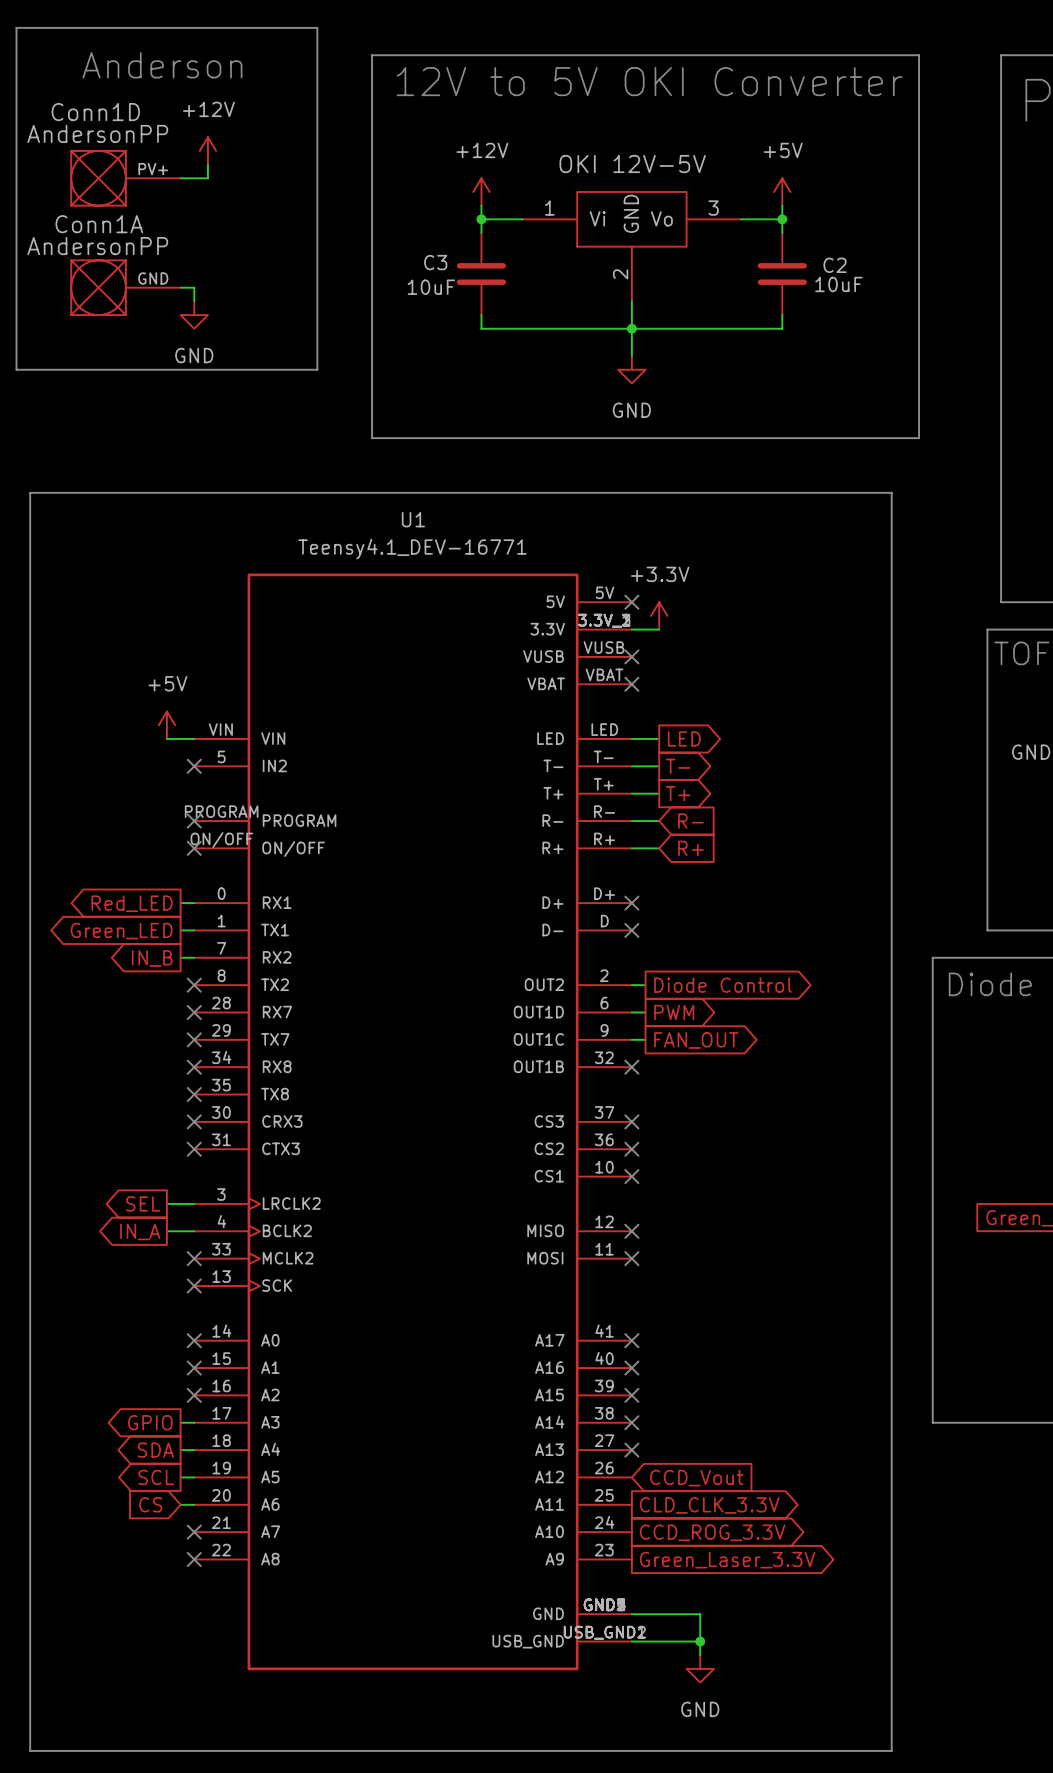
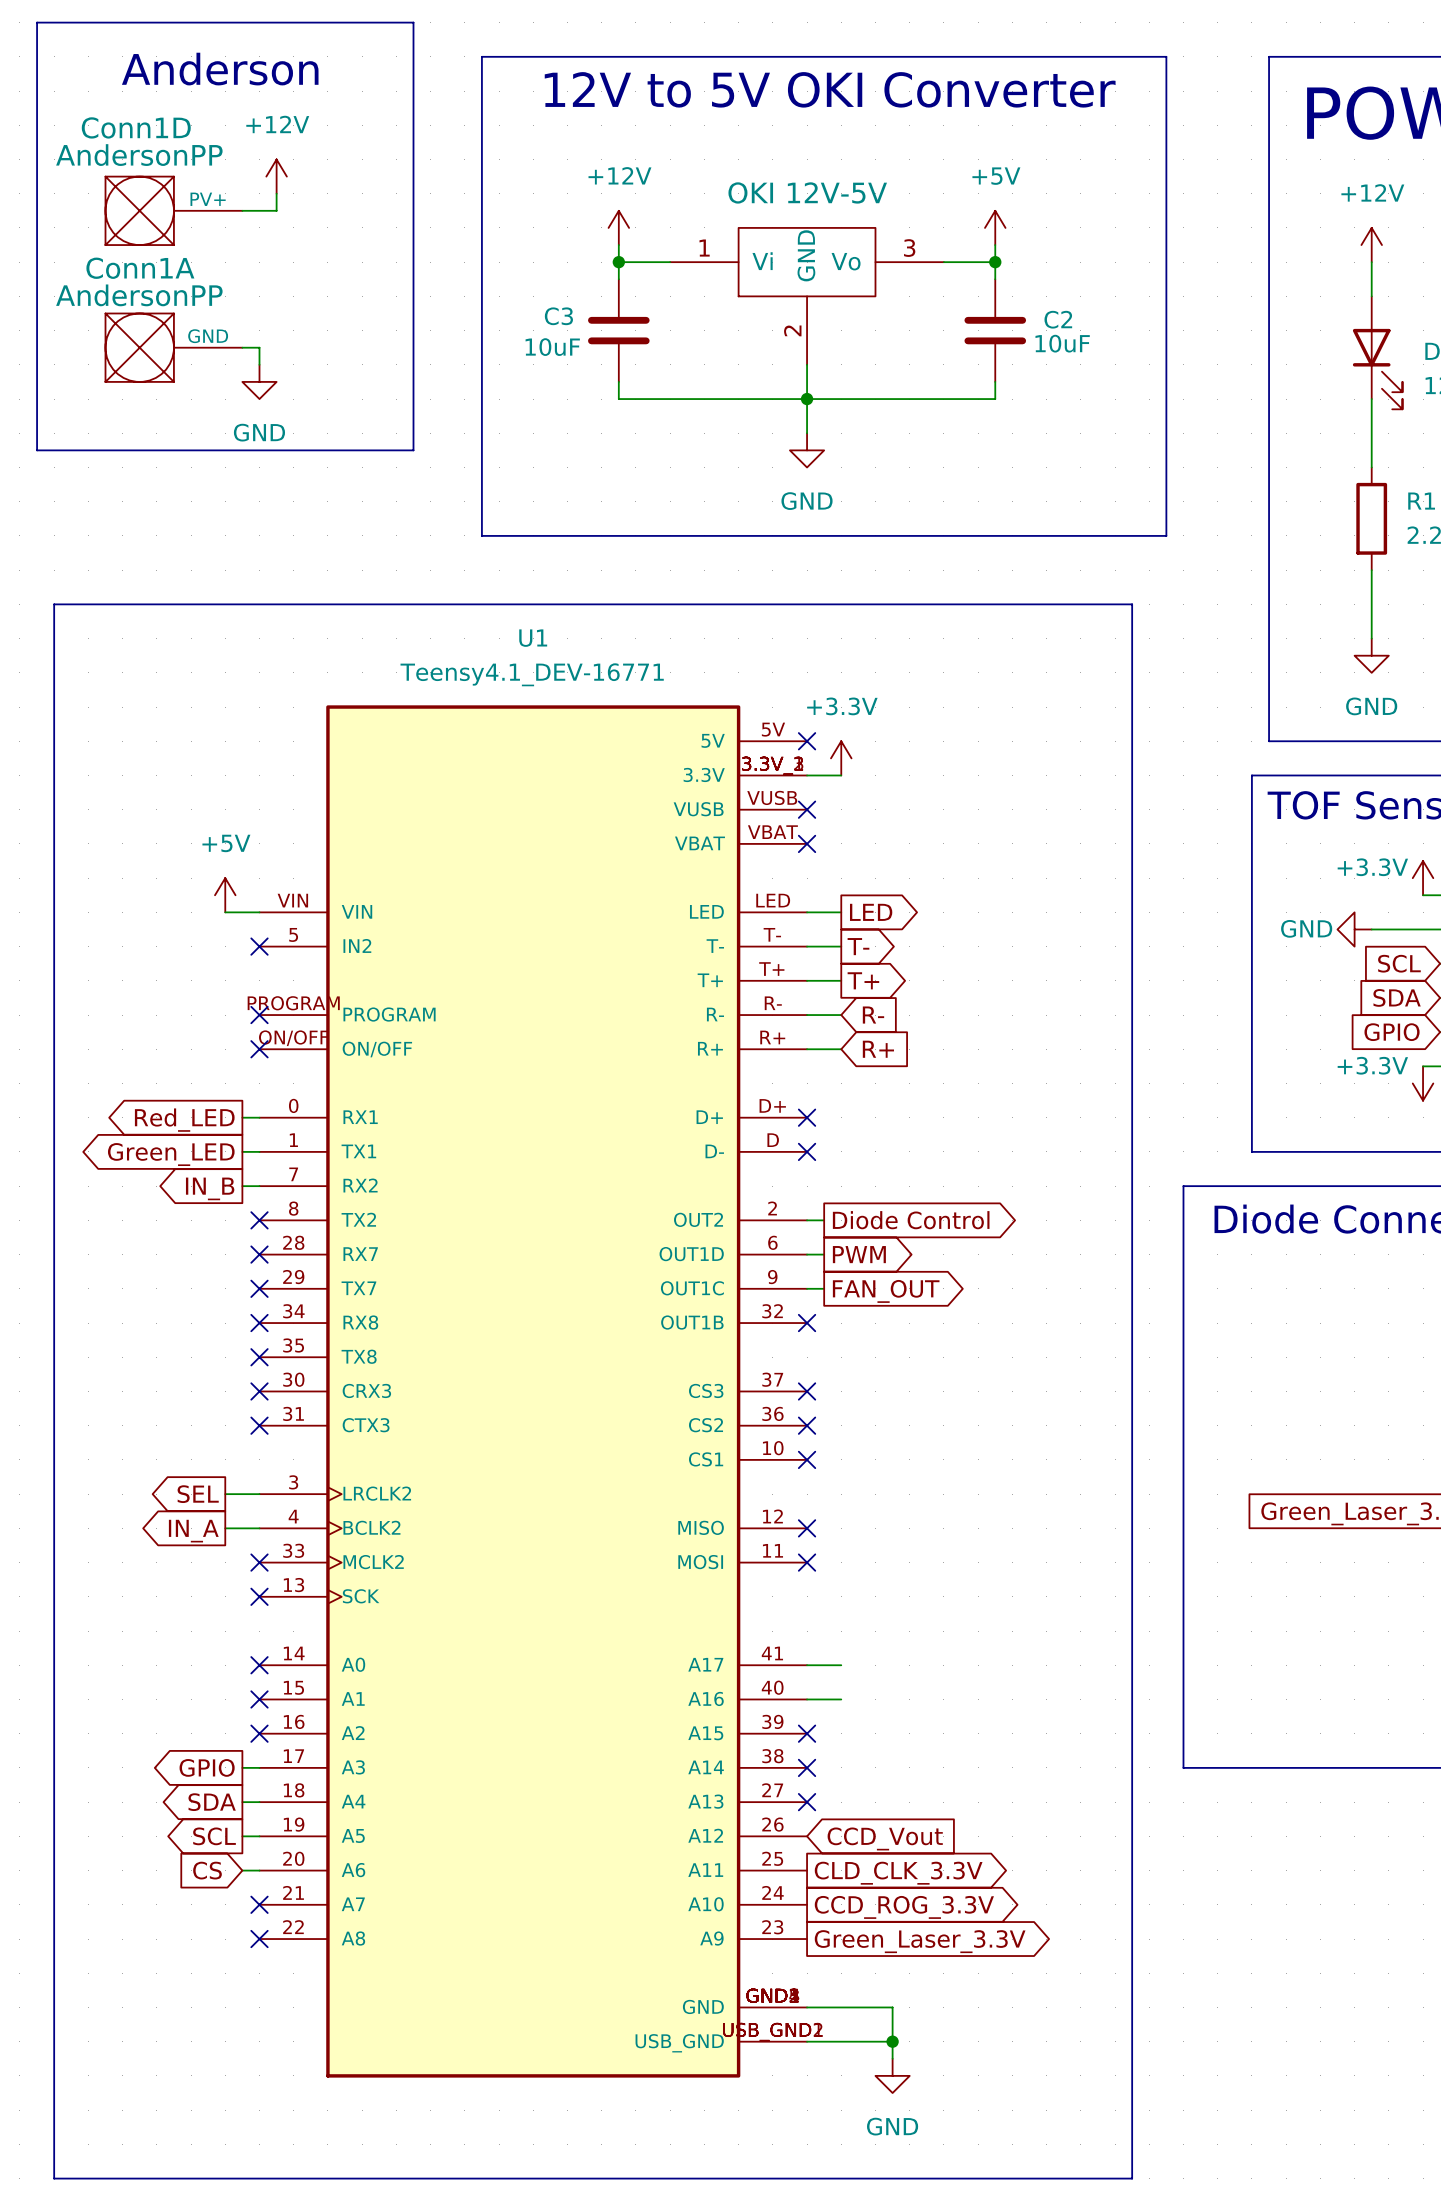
wire: none -> (807, 1665) (841, 1665)
no-connect mark: (631, 1340) -> none
wire: none -> (807, 1699) (841, 1699)
no-connect mark: (631, 1368) -> none

